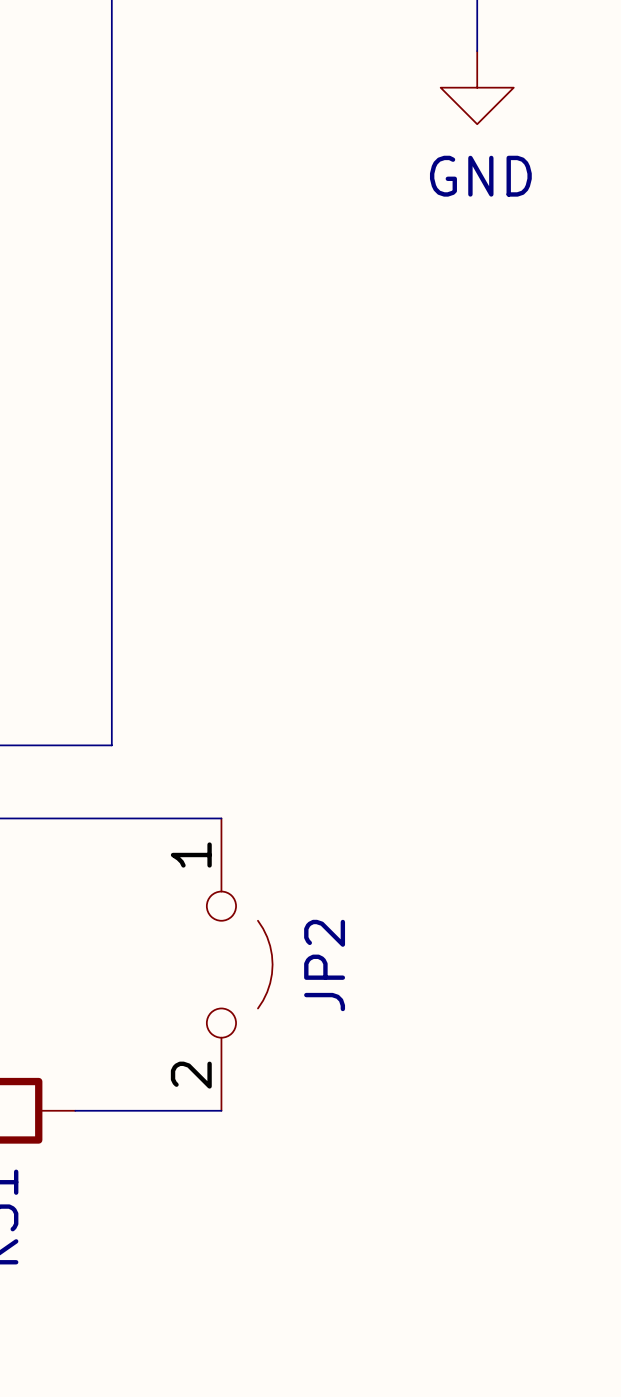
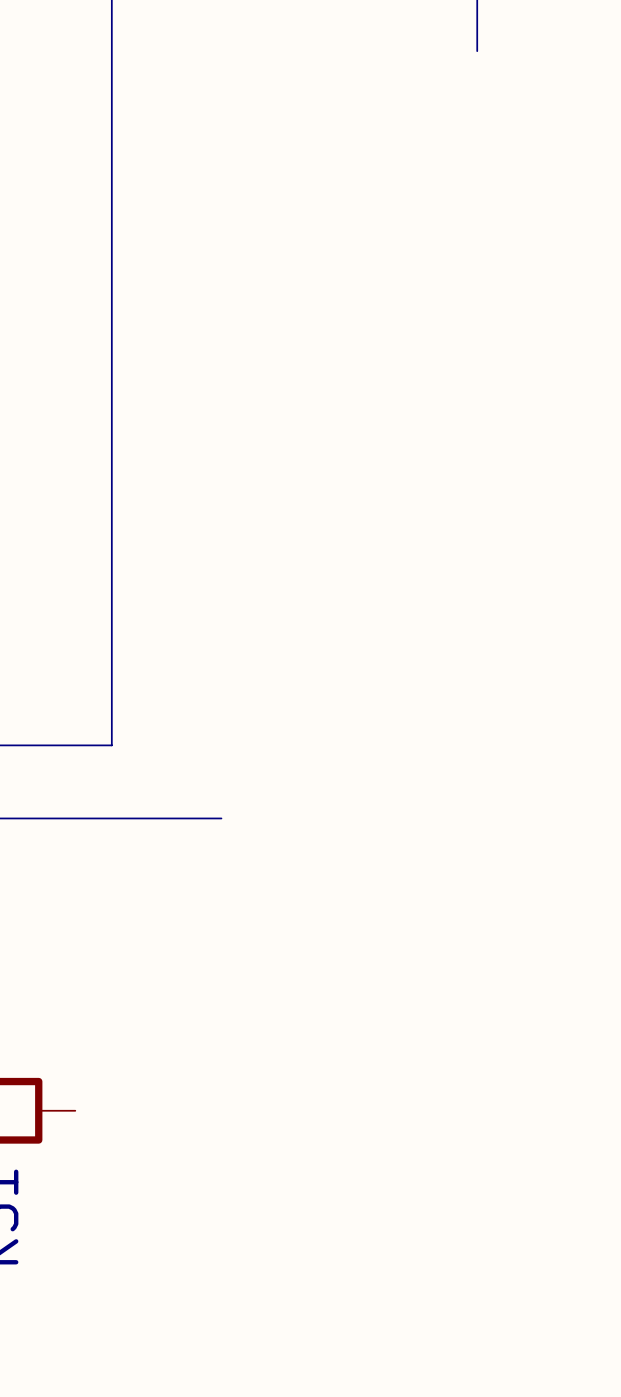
power symbol: GND (477, 87) -> none
JP2: (239, 964) -> none
wire: (75, 1110) (221, 1110) -> none

